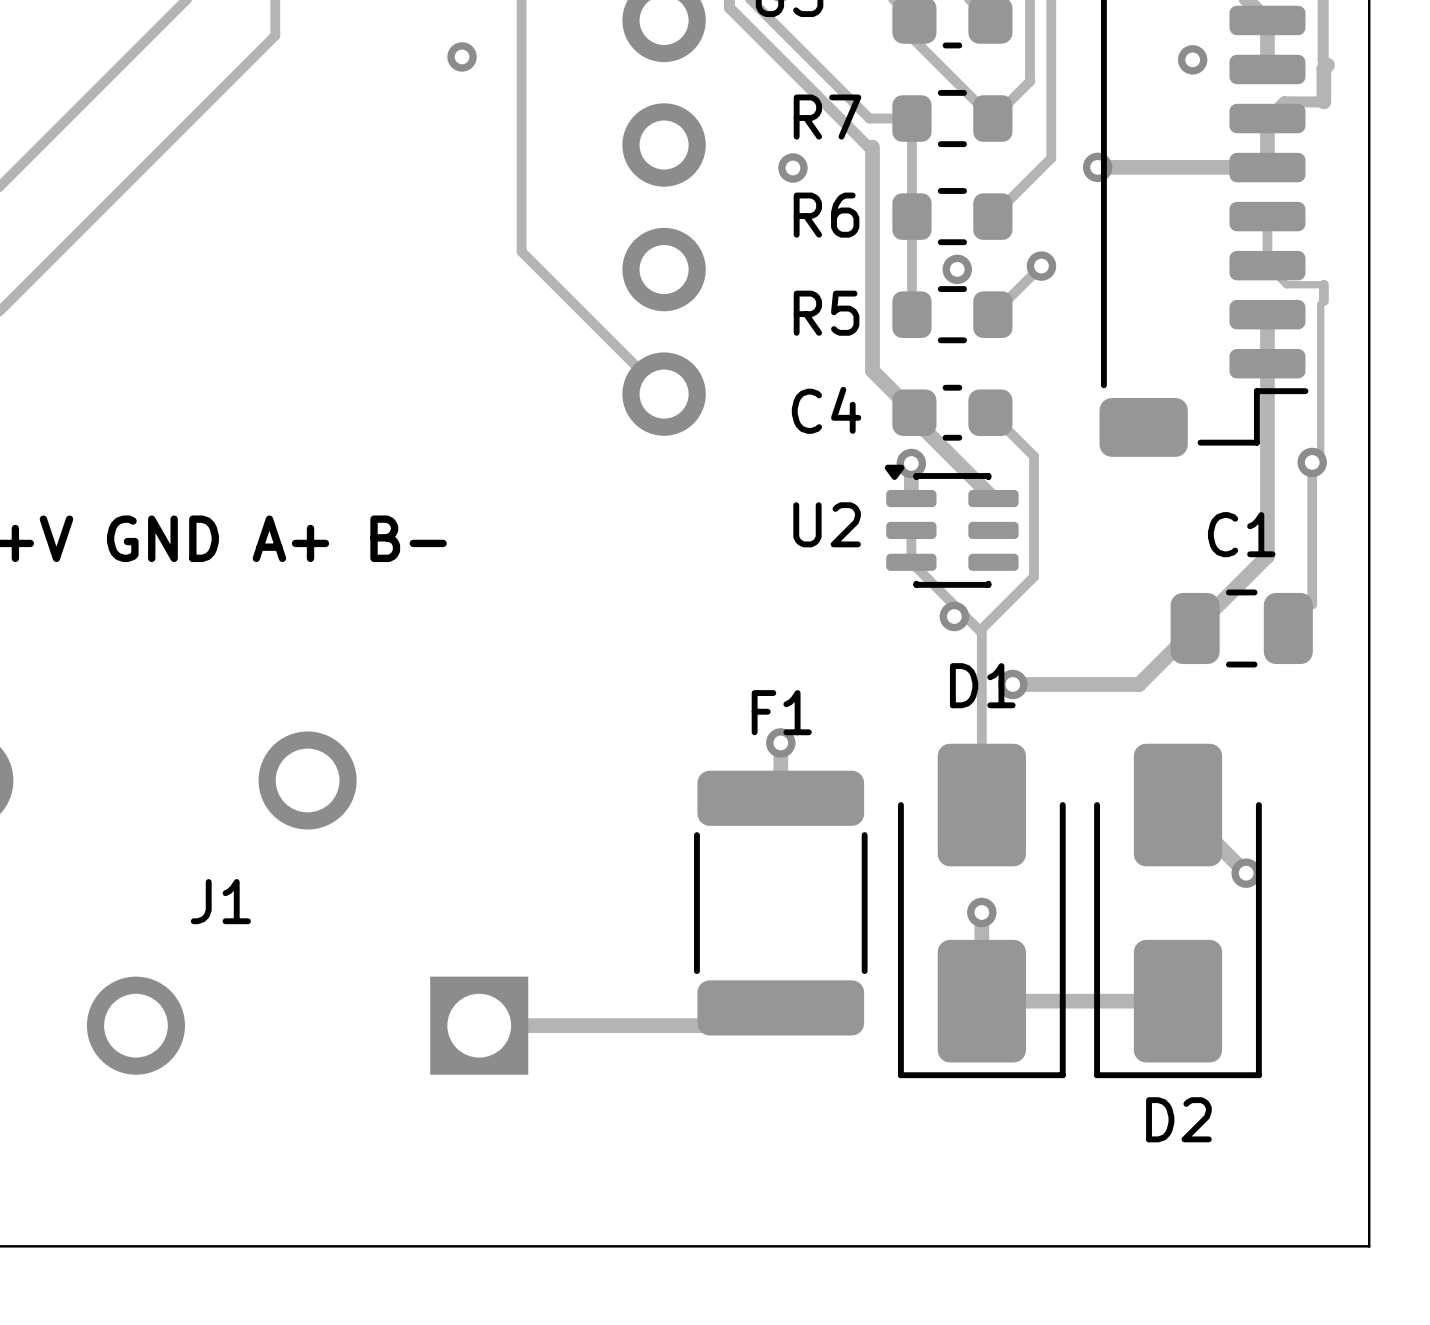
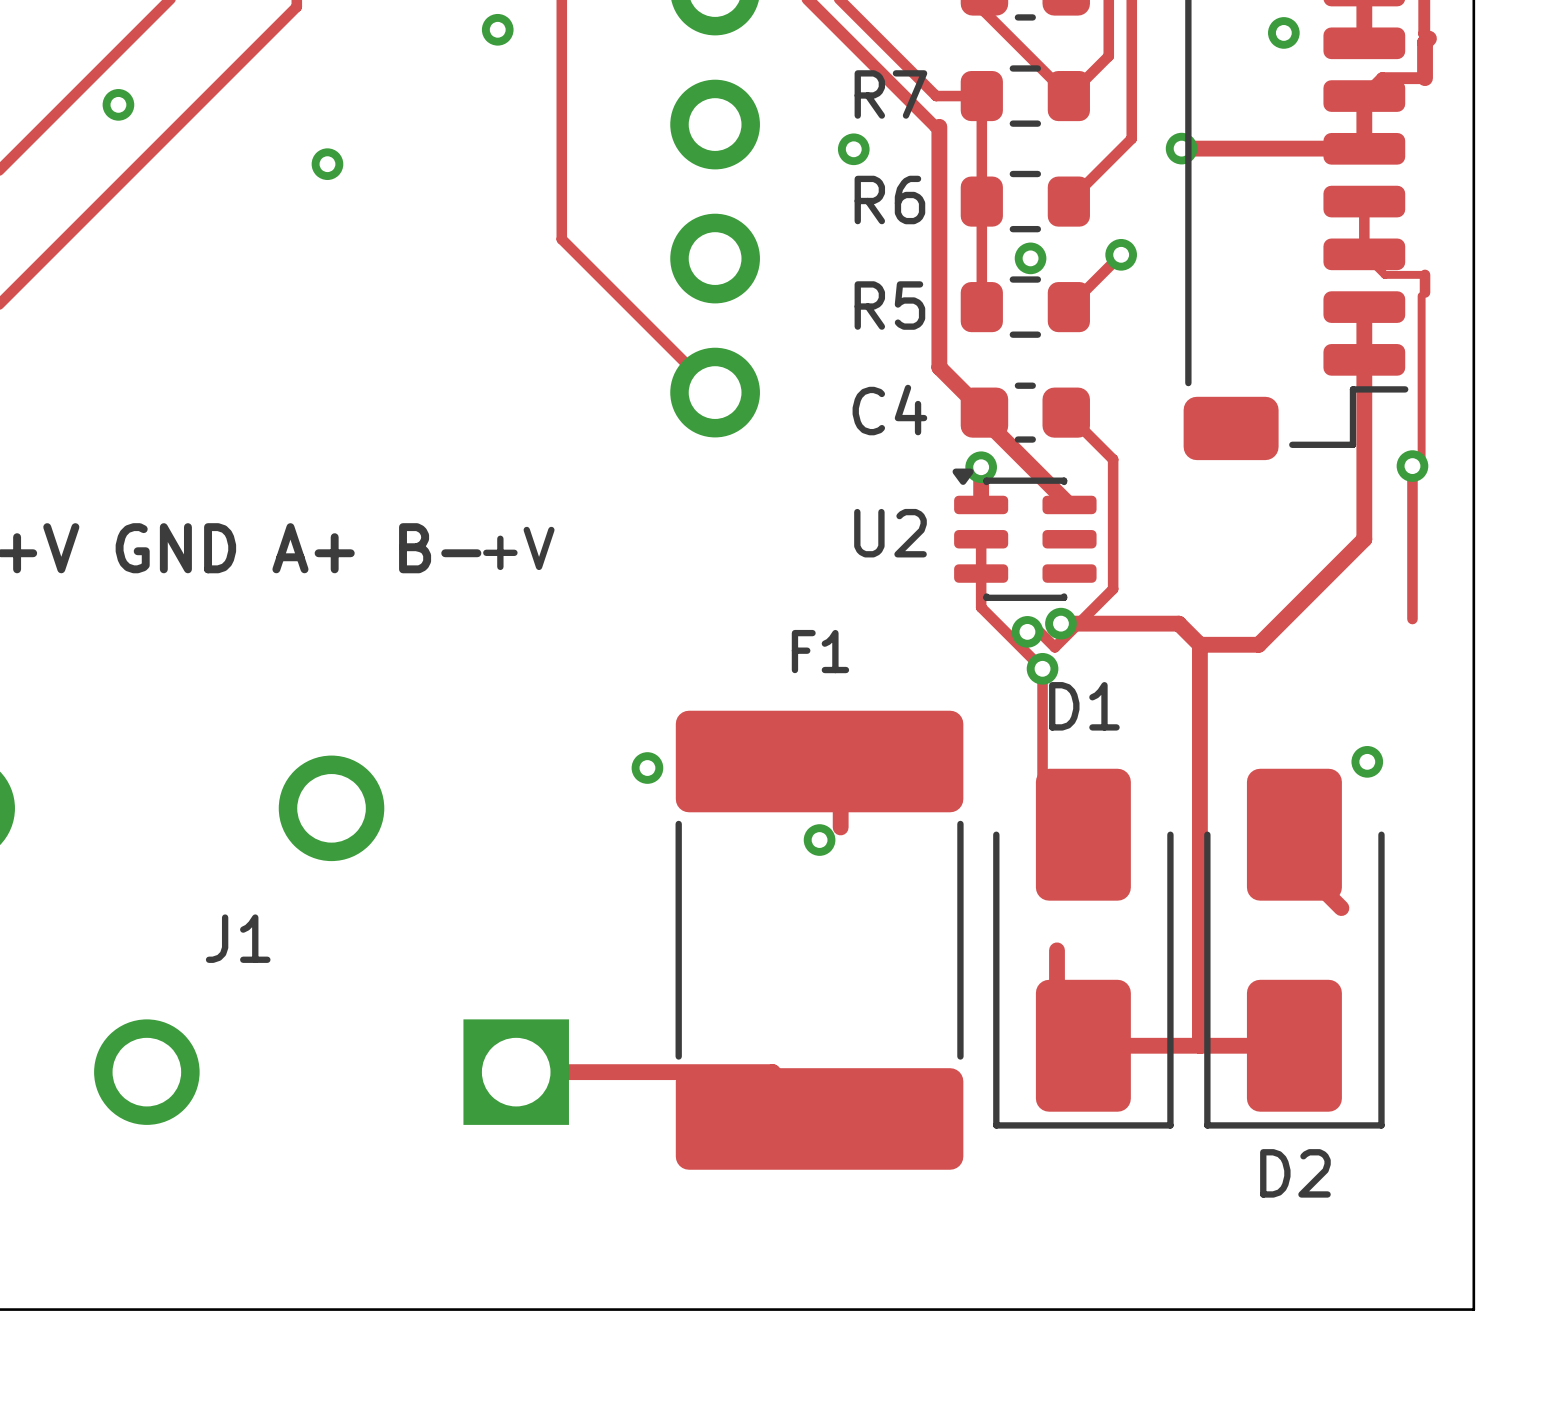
via: none -> (118, 104)
via: none -> (327, 164)
track: (1267, 530) (1267, 556) (1139, 684) (1012, 684) -> (1364, 539) (1258, 644) (1199, 644)
text: none -> +V (518, 548)
track: (911, 562) (954, 605) -> (981, 573) (981, 607) (1042, 668) (1042, 793)
track: none -> (1060, 623) (1178, 623) (1199, 644)
via: none -> (1060, 623)
track: none -> (1199, 644) (1199, 1045)
C1: (1241, 628) -> none
track: (981, 632) (981, 805) -> none
via: none -> (1042, 668)
via: (1012, 684) -> none
via: none -> (1367, 761)
via position: (780, 742) -> (819, 840)
via: none -> (647, 768)
F1 footprint: [693, 770, 868, 1036] -> [675, 710, 964, 1170]
via: (1246, 873) -> none
D1 position: (981, 910) -> (1083, 948)
D2 position: (1177, 910) -> (1294, 948)
via: (981, 912) -> none

